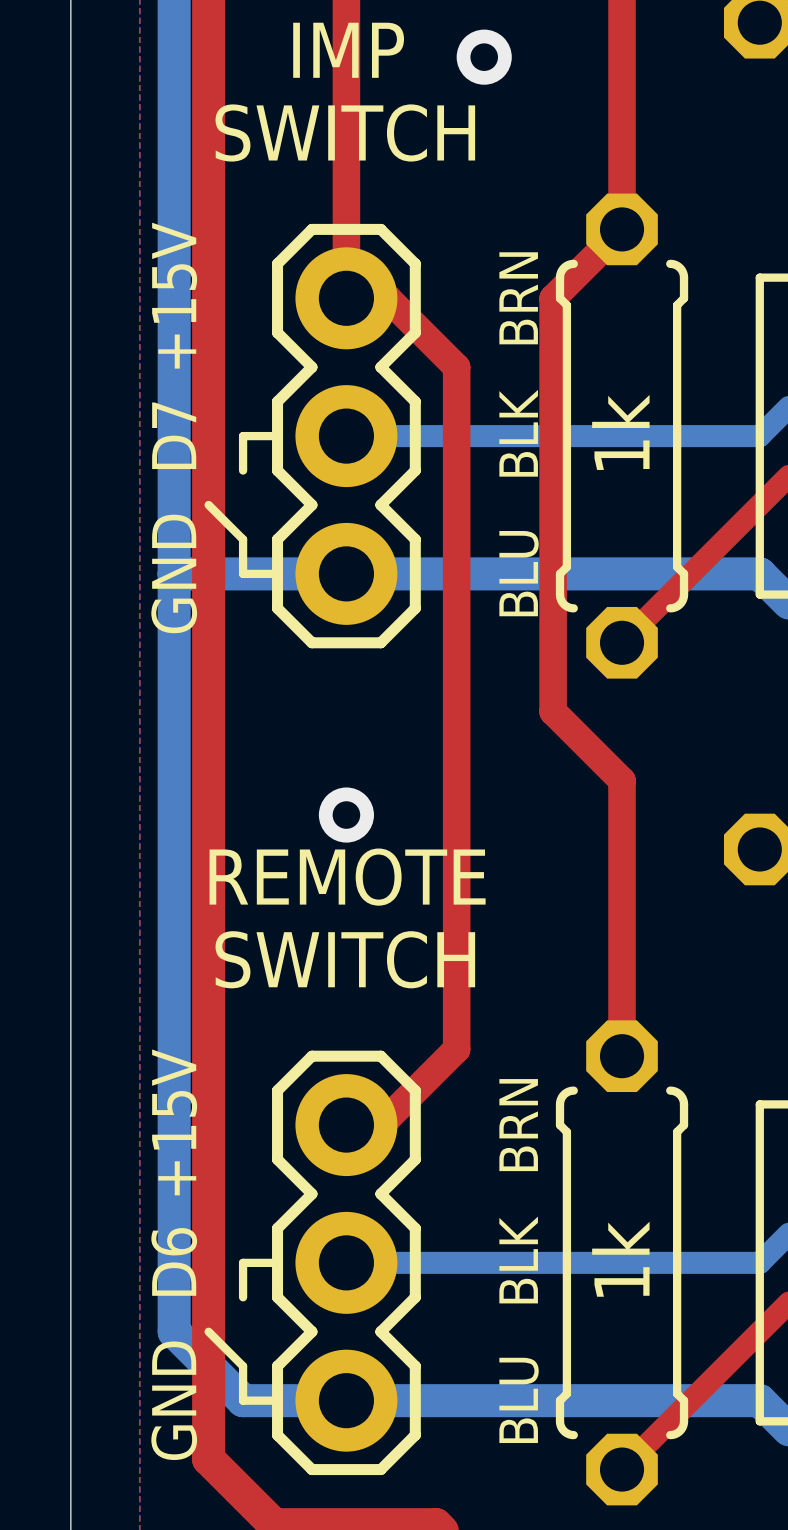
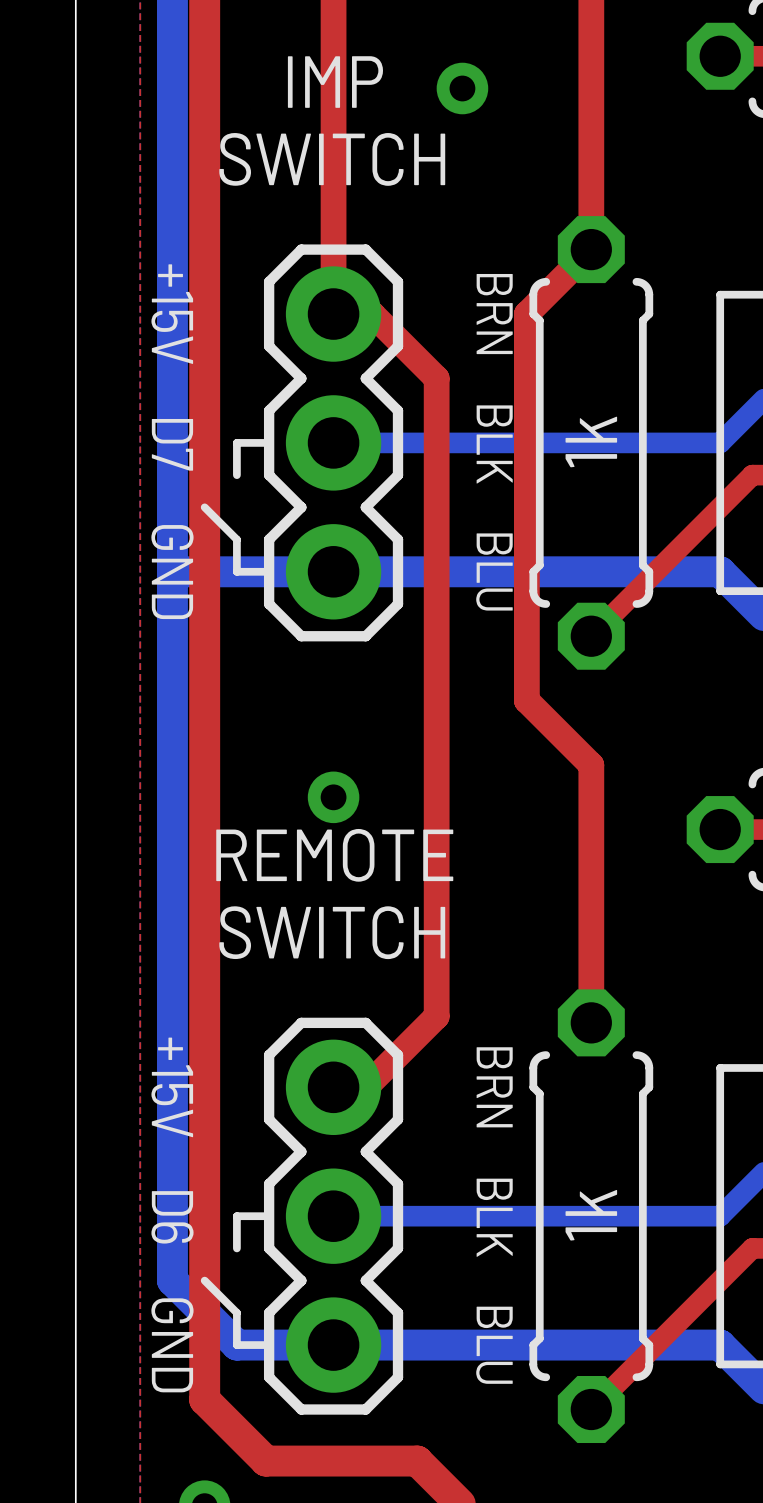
text rotation: 0° (174, 295) -> 180° (172, 314)
text rotation: 0° (518, 298) -> 180° (494, 314)
text rotation: 0° (518, 433) -> 180° (494, 444)
text rotation: 0° (174, 435) -> 180° (172, 444)
text rotation: 0° (174, 573) -> 180° (172, 572)
text rotation: 0° (519, 573) -> 180° (494, 571)
text rotation: 0° (174, 1122) -> 180° (172, 1087)
text rotation: 0° (518, 1125) -> 180° (494, 1087)
text rotation: 0° (518, 1260) -> 180° (494, 1217)
text rotation: 0° (174, 1261) -> 180° (172, 1217)
text rotation: 0° (174, 1400) -> 180° (172, 1345)
text rotation: 0° (519, 1400) -> 180° (494, 1345)

